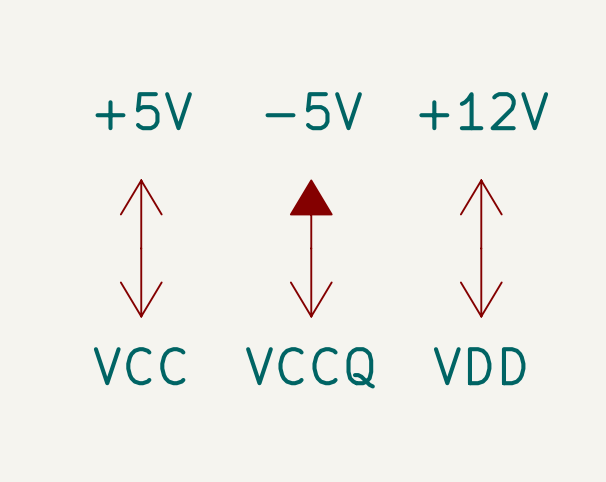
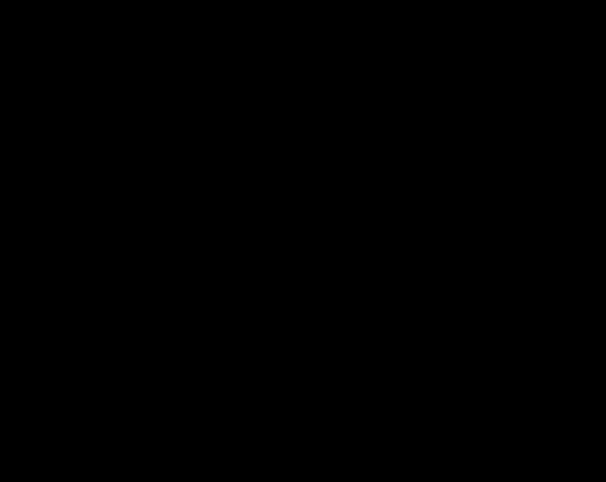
power symbol: +5V (141, 214) -> none
power symbol: -5V (311, 214) -> none
power symbol: +12V (481, 214) -> none
power symbol: VCC (141, 282) -> none
power symbol: VCCQ (311, 282) -> none
power symbol: VDD (481, 282) -> none

